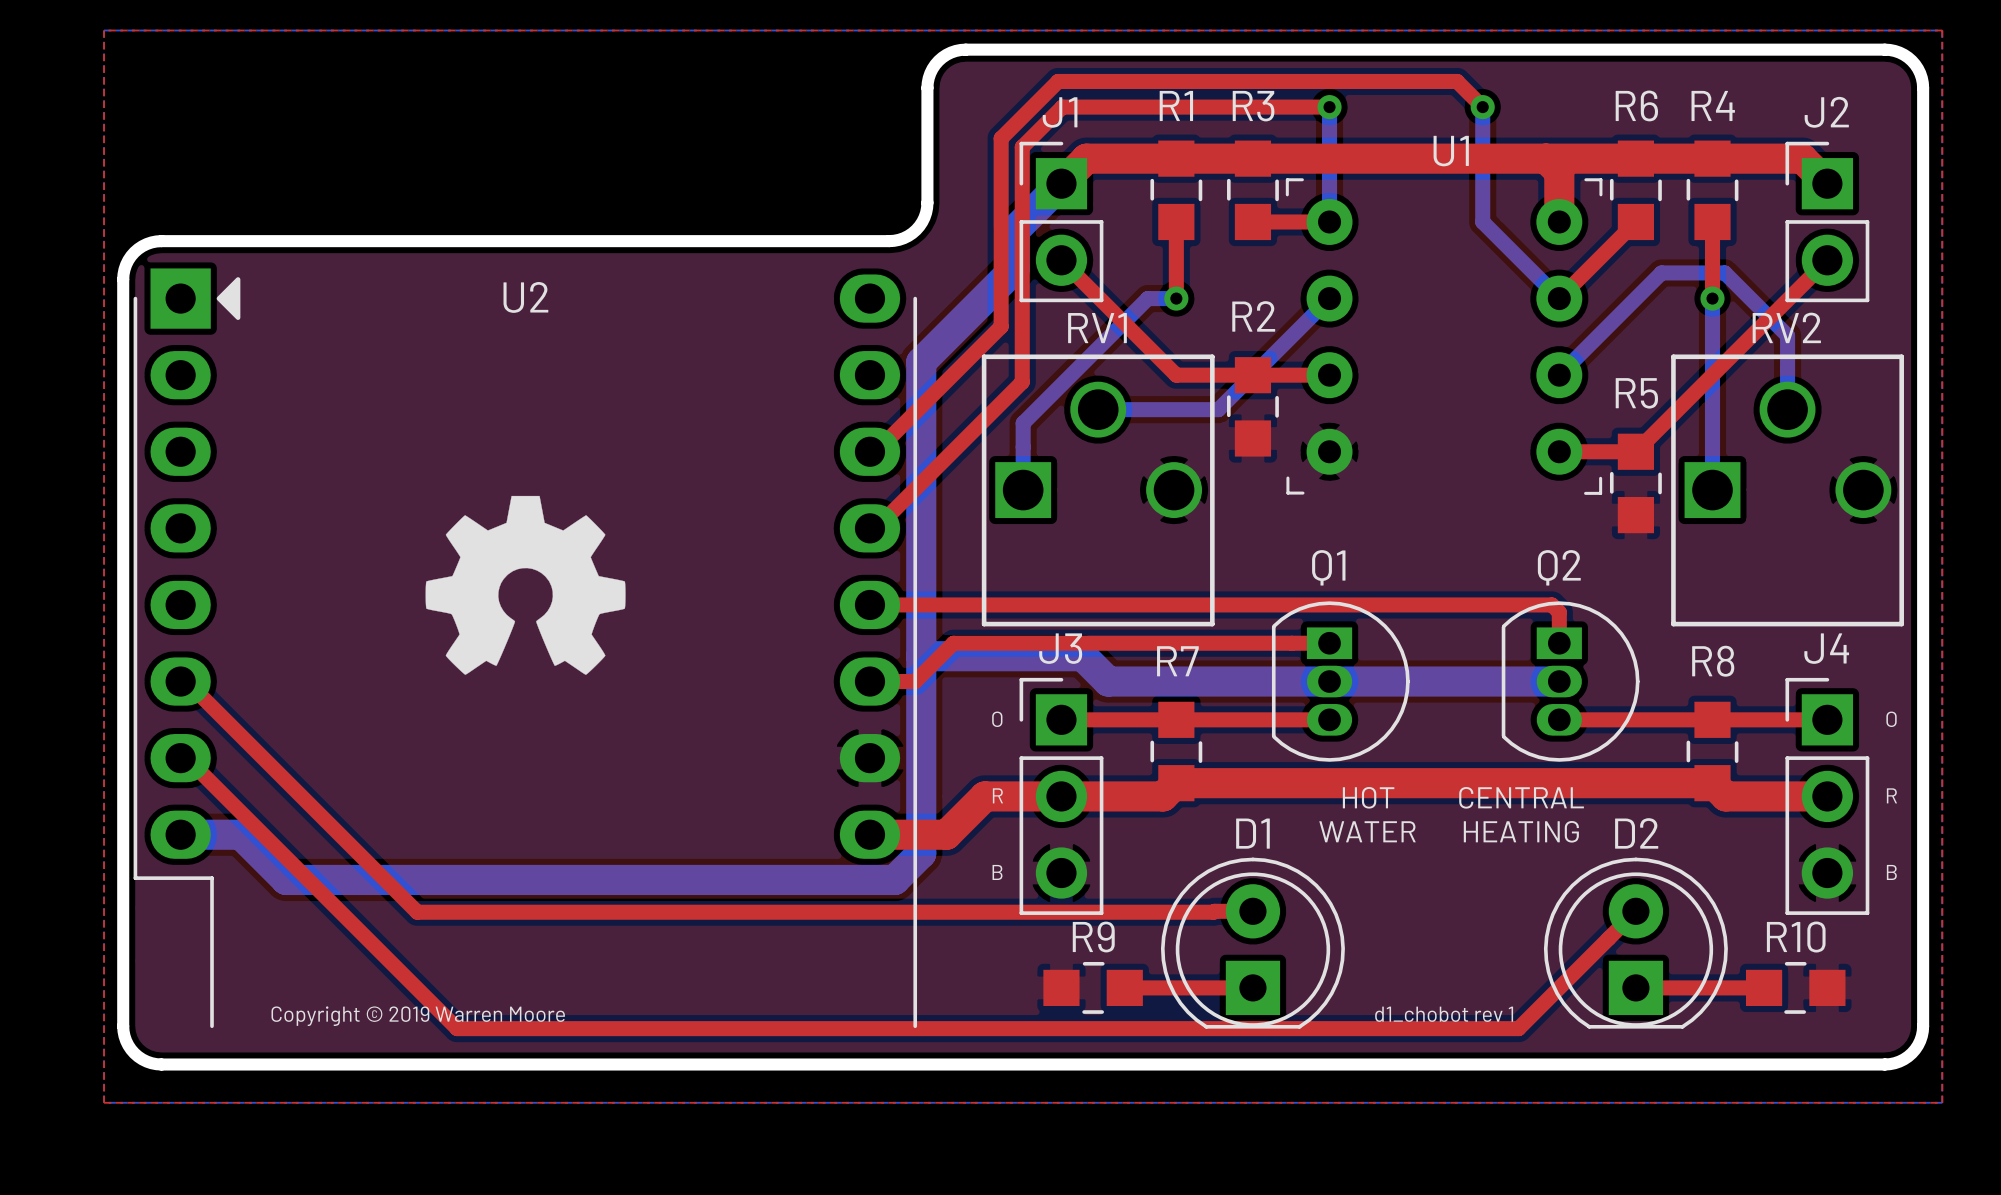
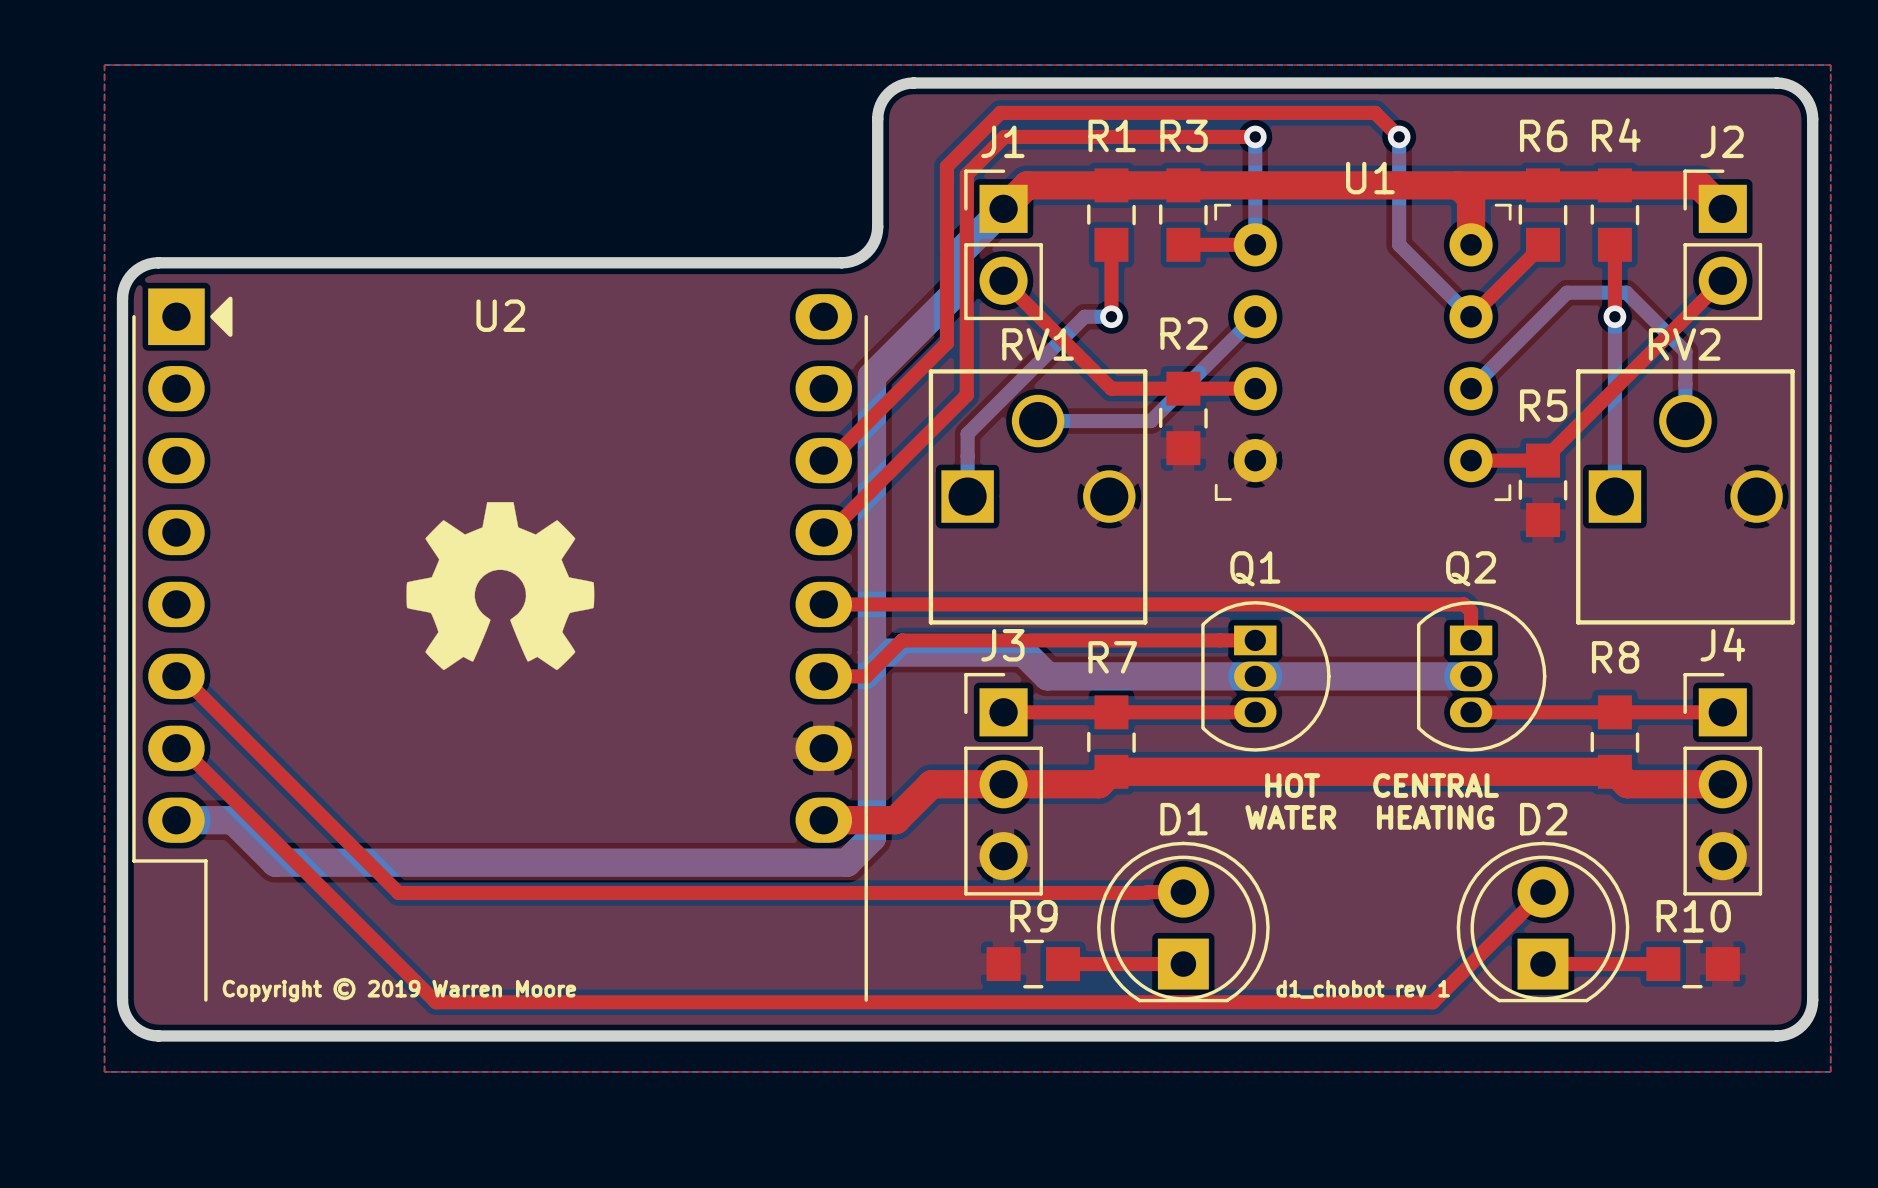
text: O (997, 719) -> none
text: O (1891, 719) -> none
text: R (997, 795) -> none
text: R (1891, 795) -> none
text: B (997, 872) -> none
text: B (1891, 872) -> none

